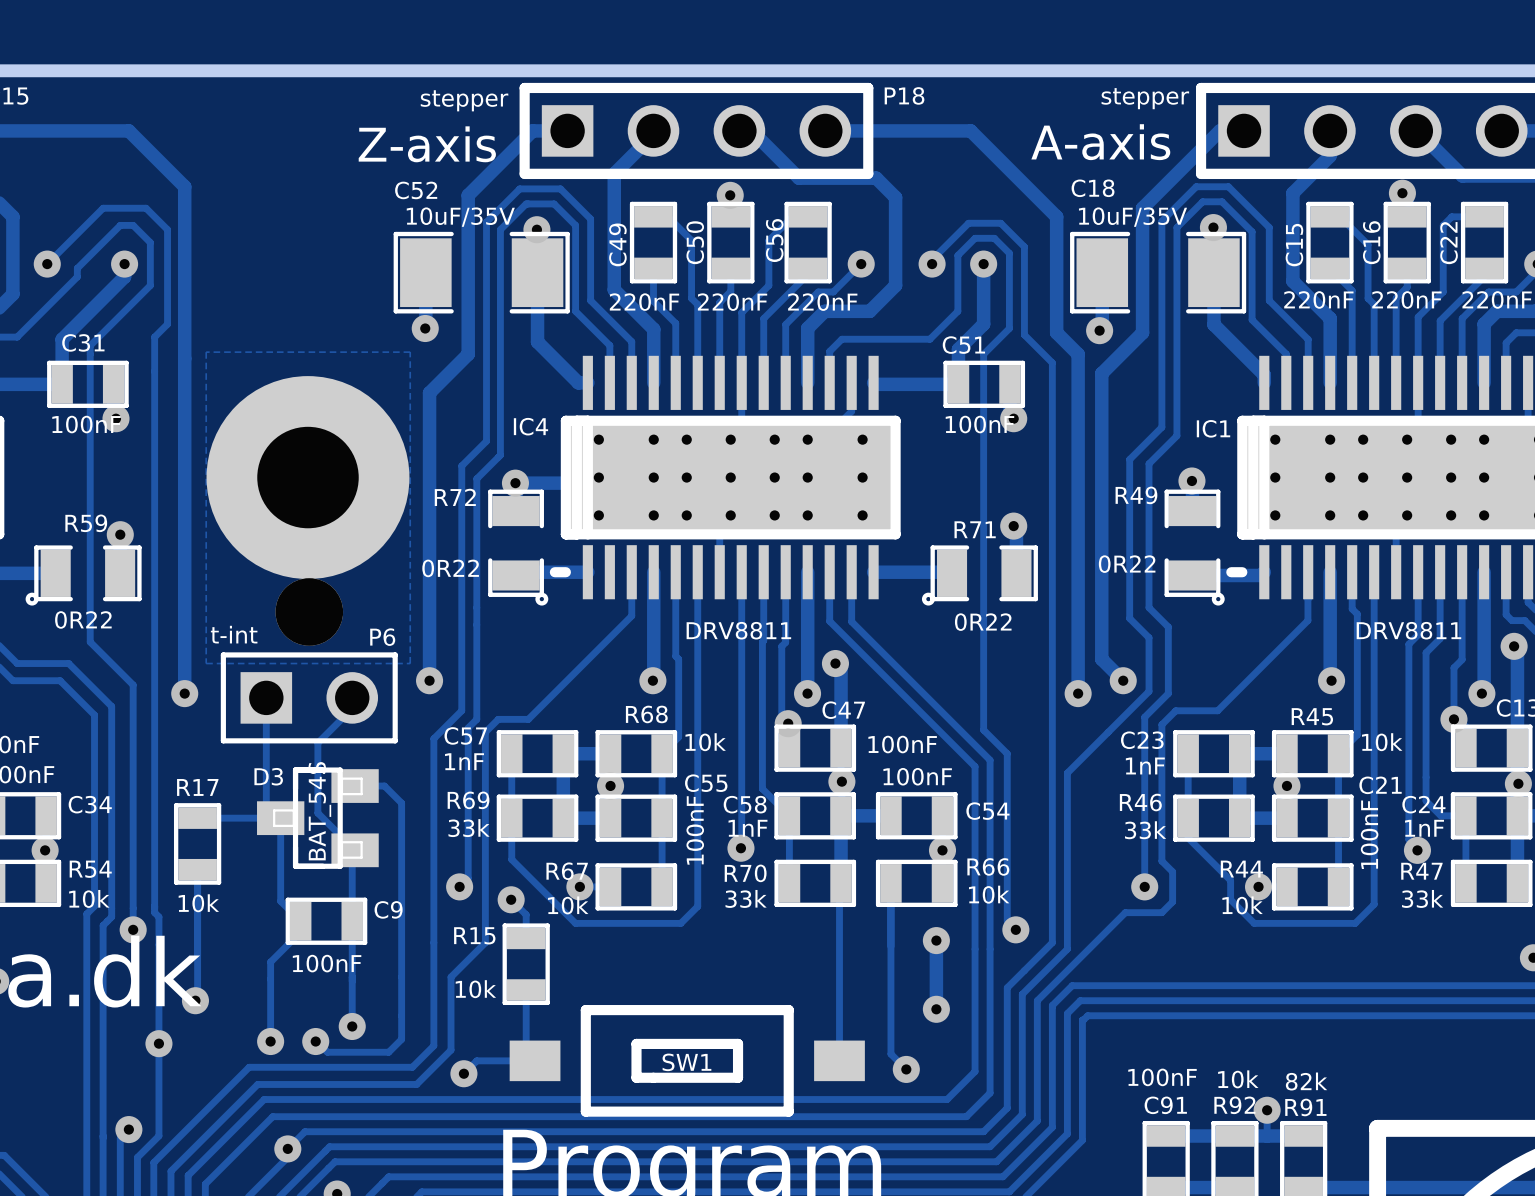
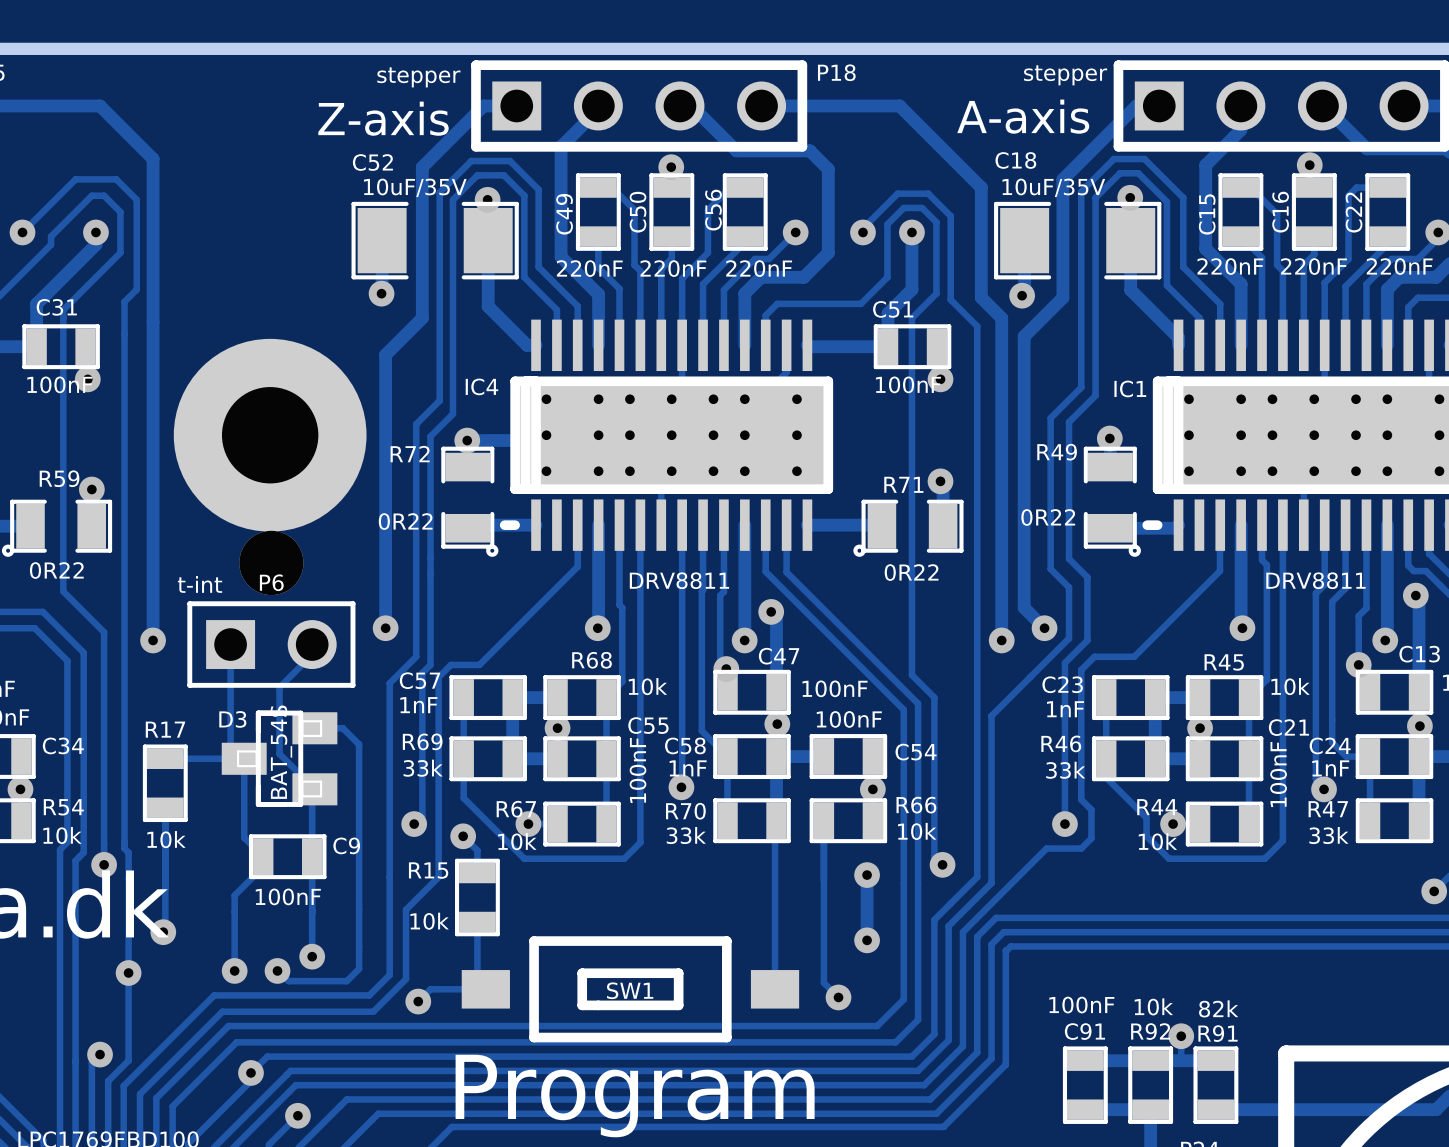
zone outline: (206, 352) (410, 352) (410, 663) (206, 663) (206, 352) -> none
P6 name position: P6 (382, 637) -> P6 (271, 582)

